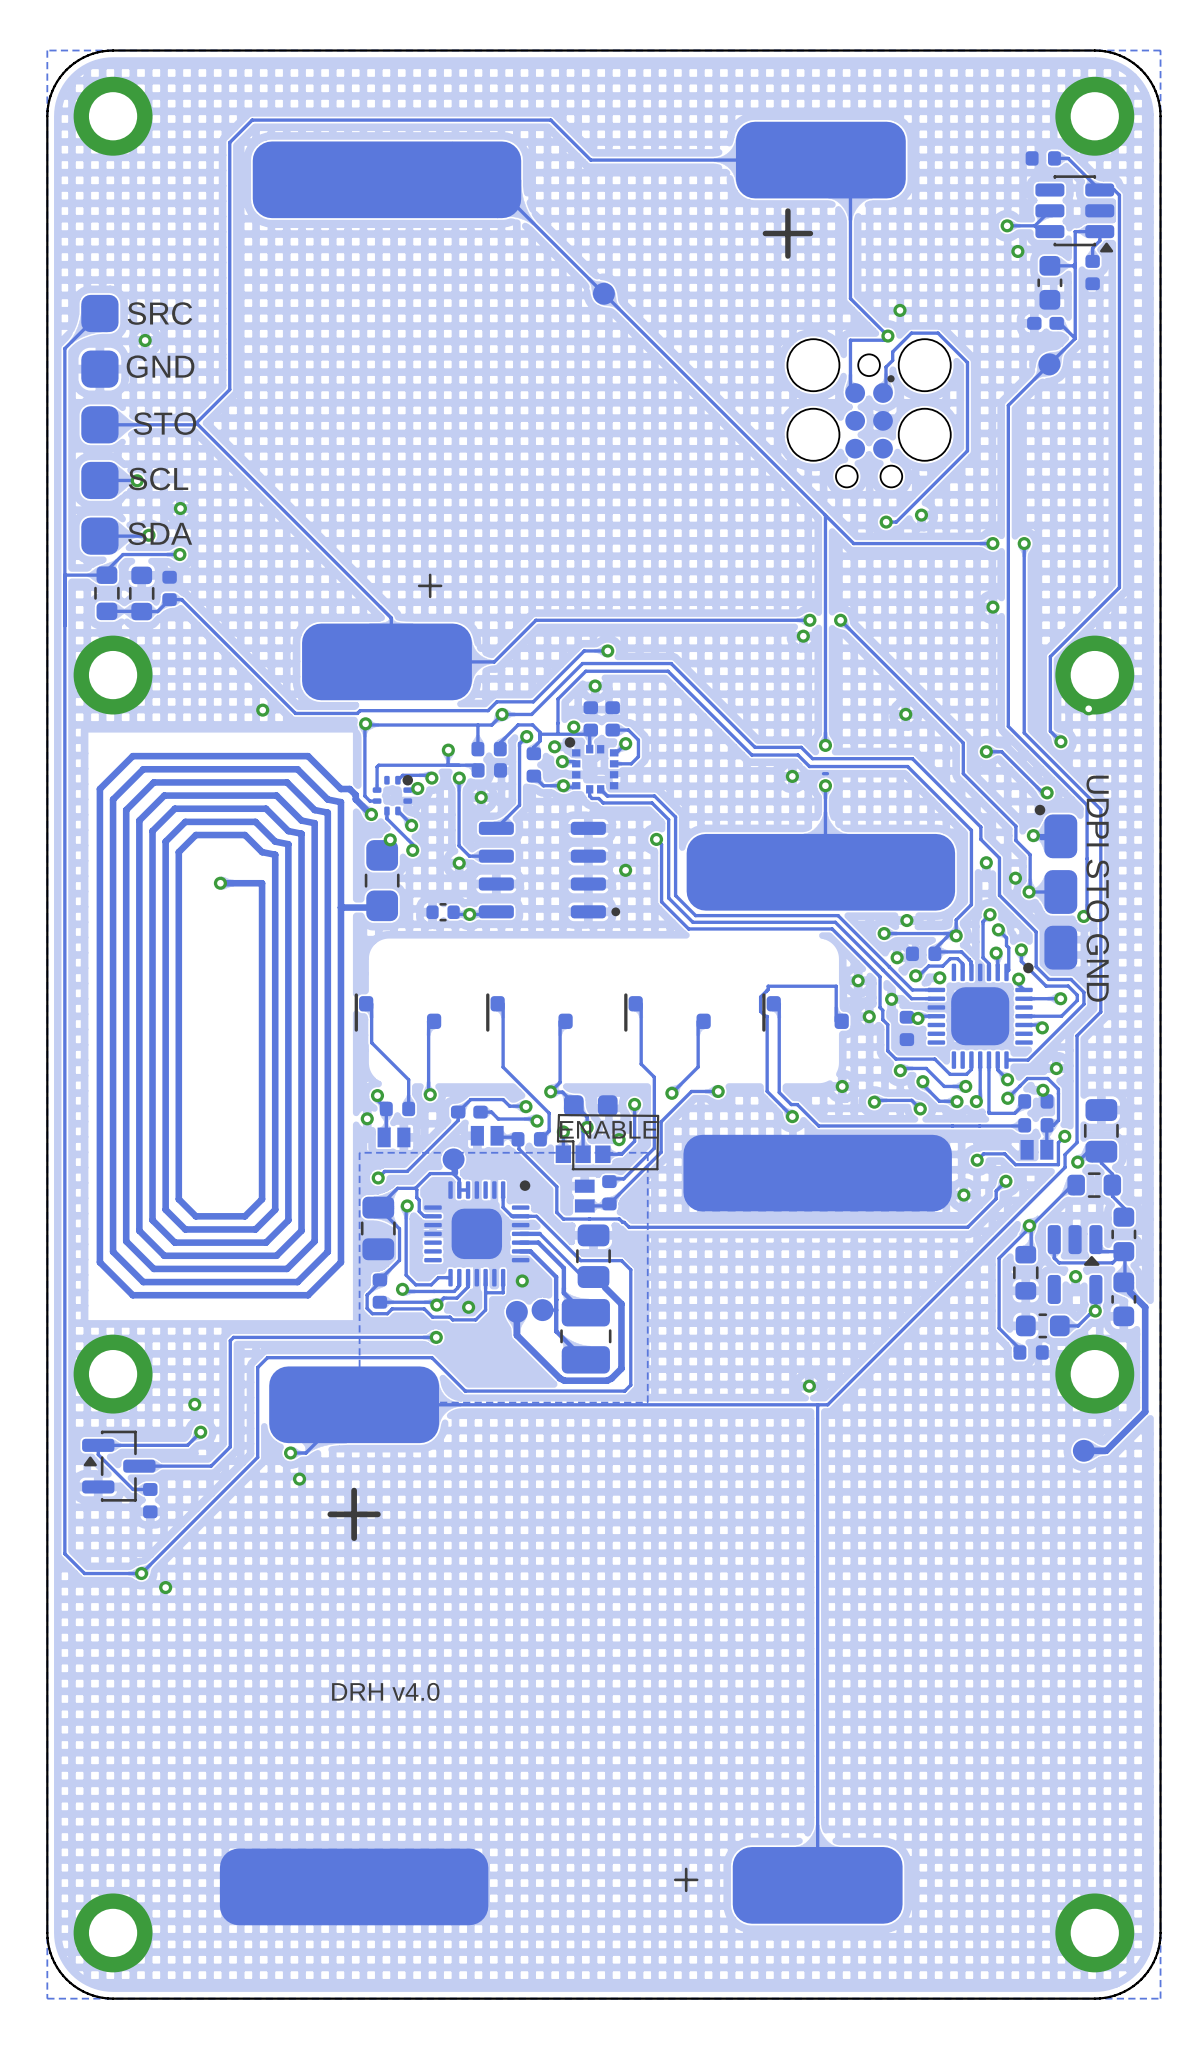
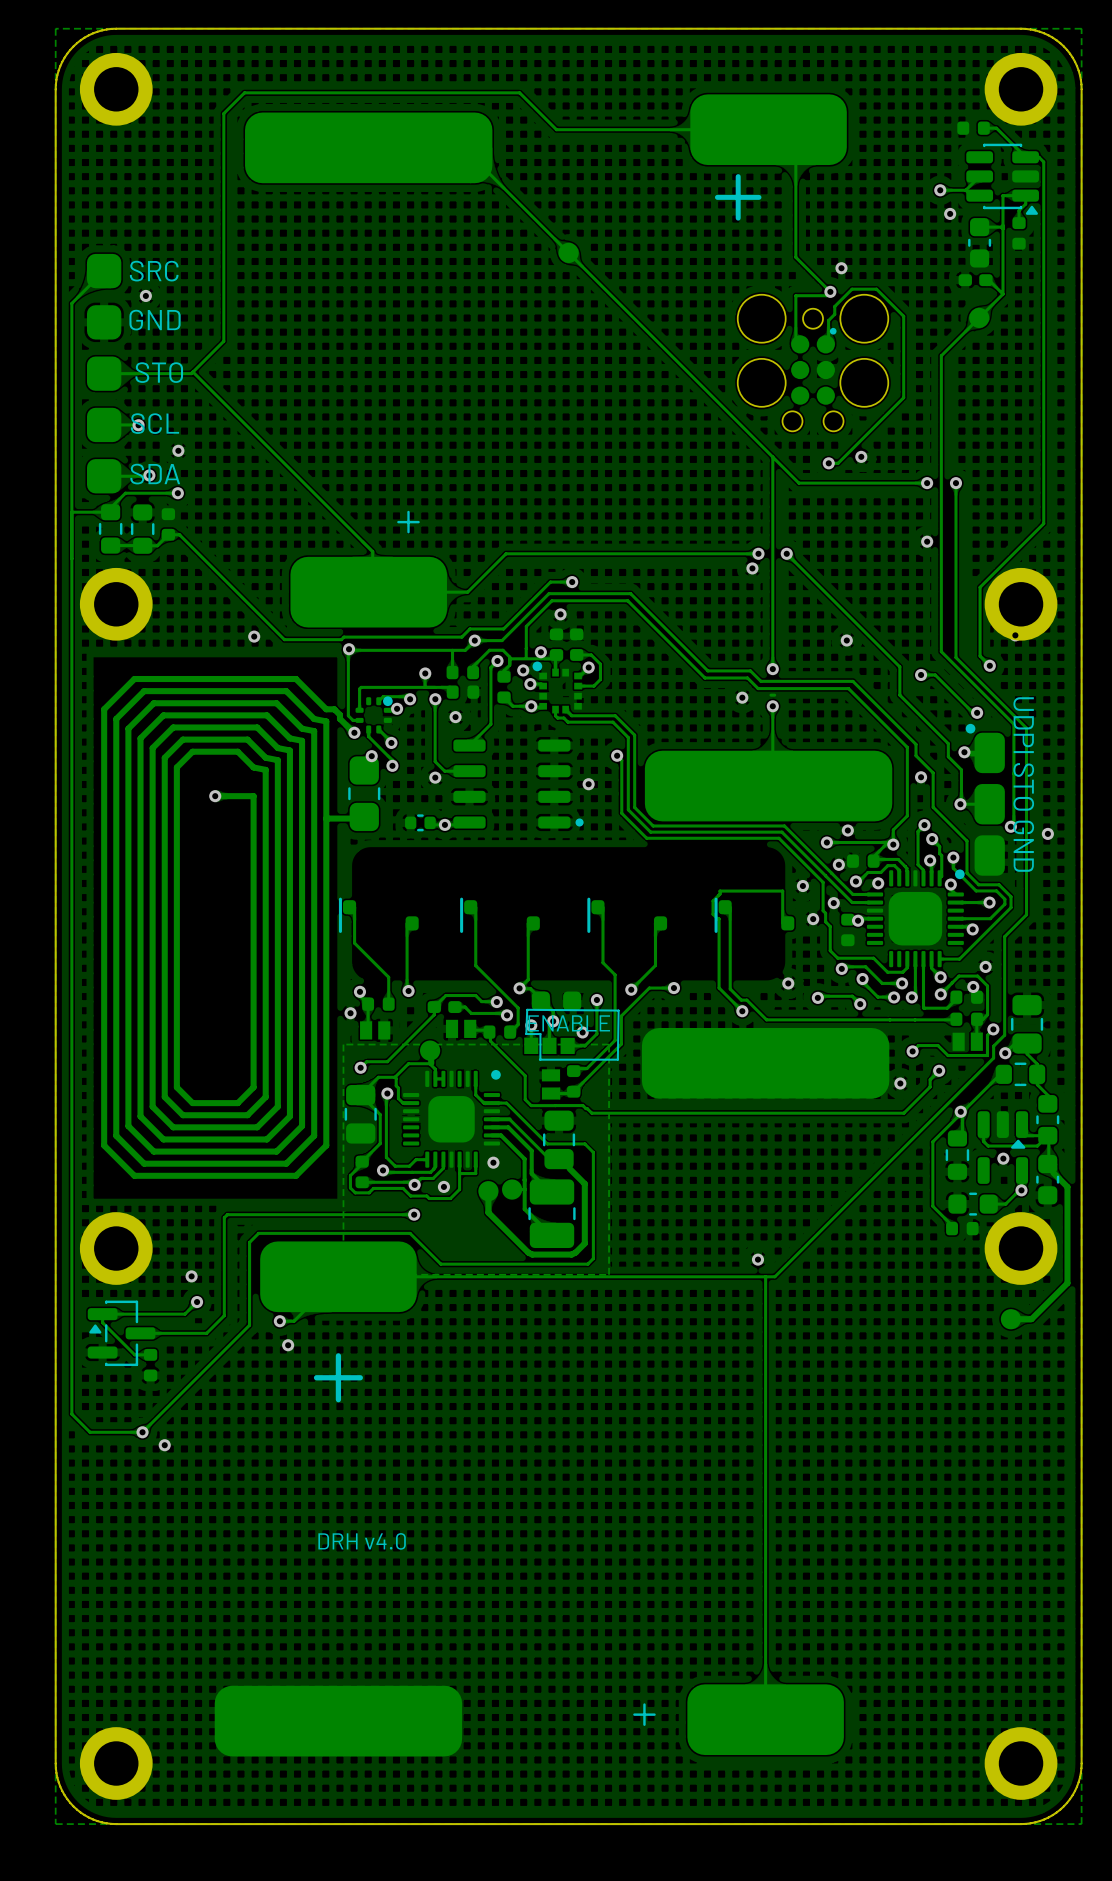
via position: (1015, 878) -> (1047, 833)

